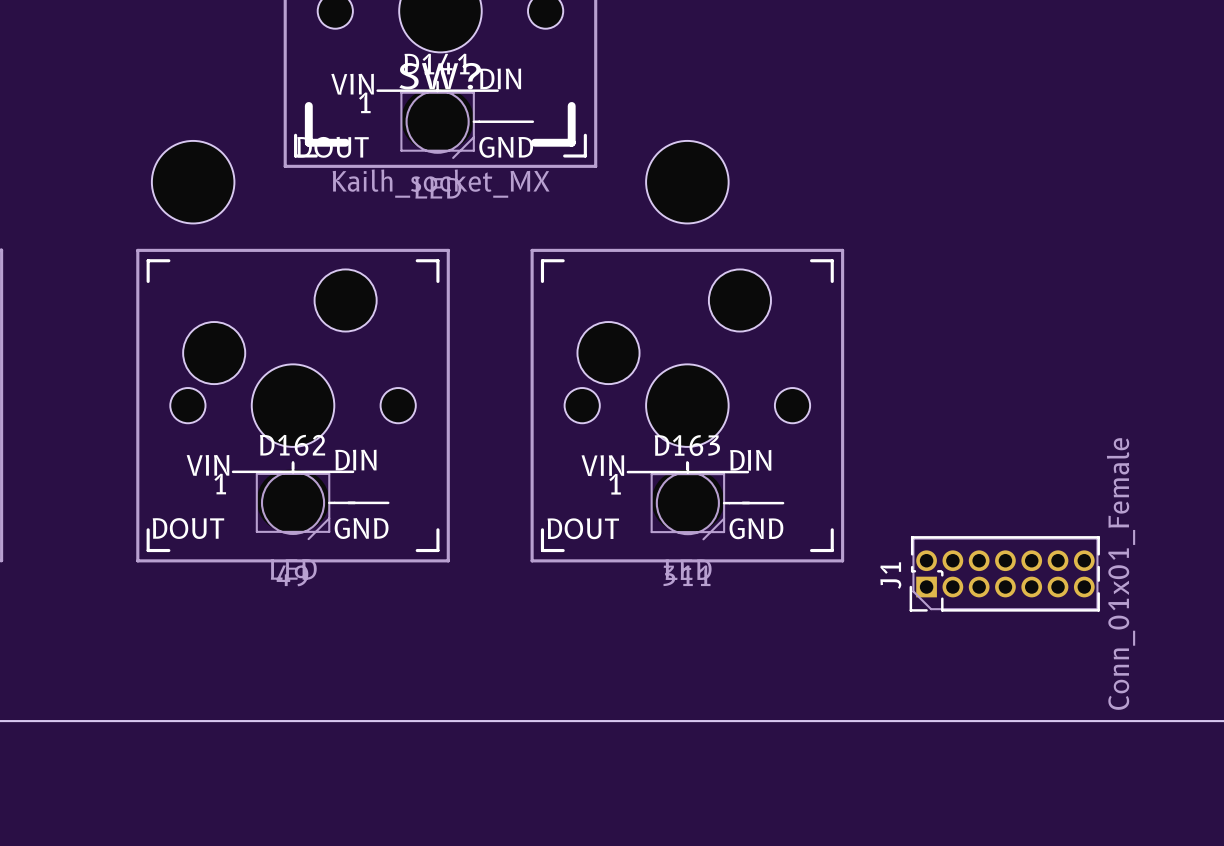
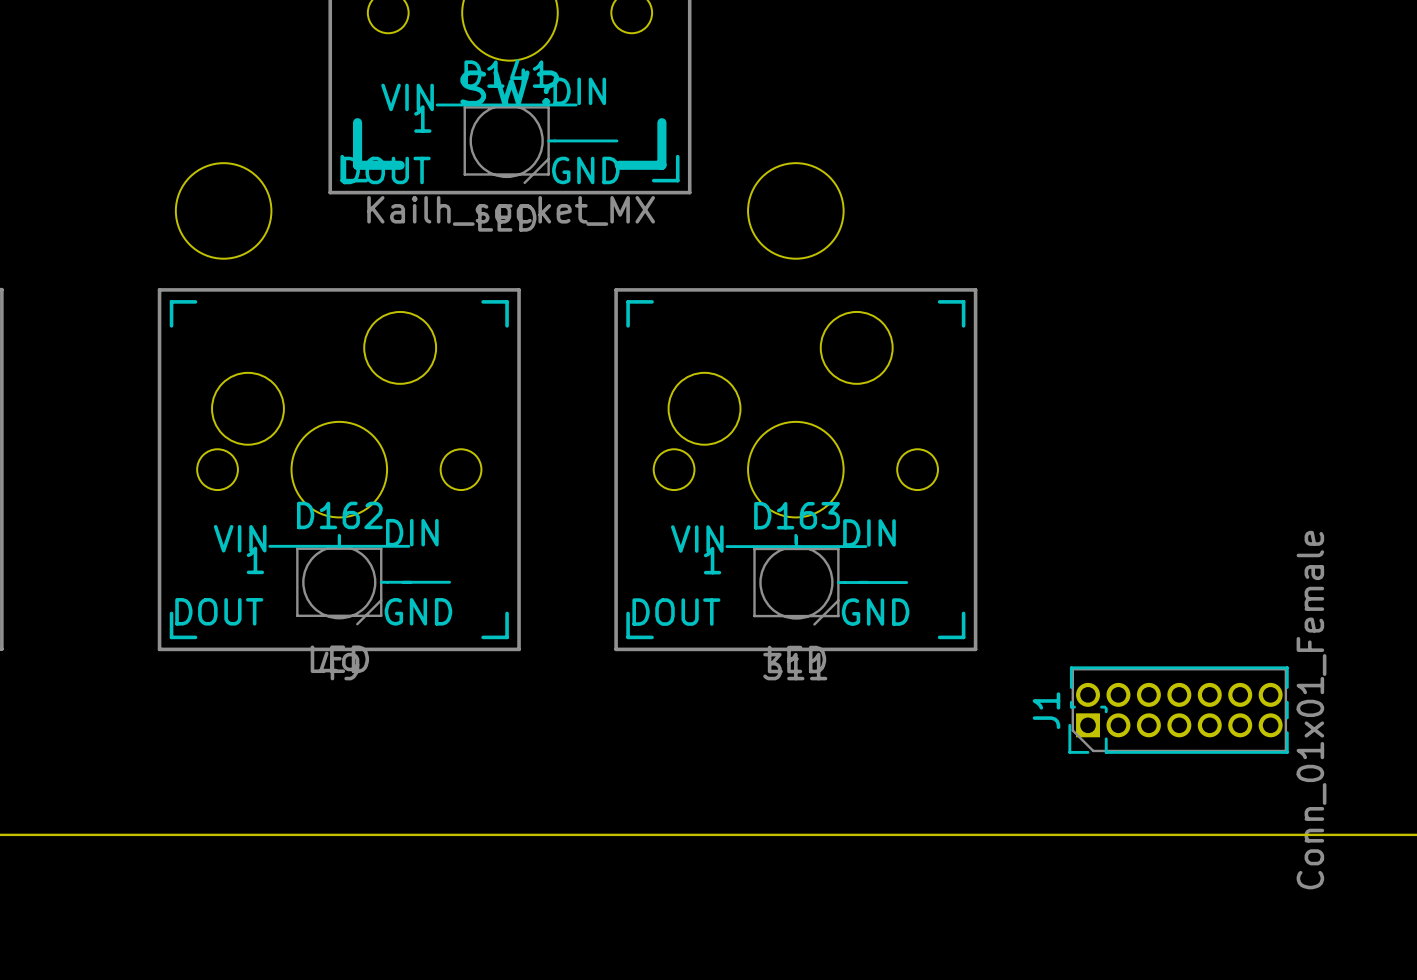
J1 position: (1004, 573) -> (1178, 710)

